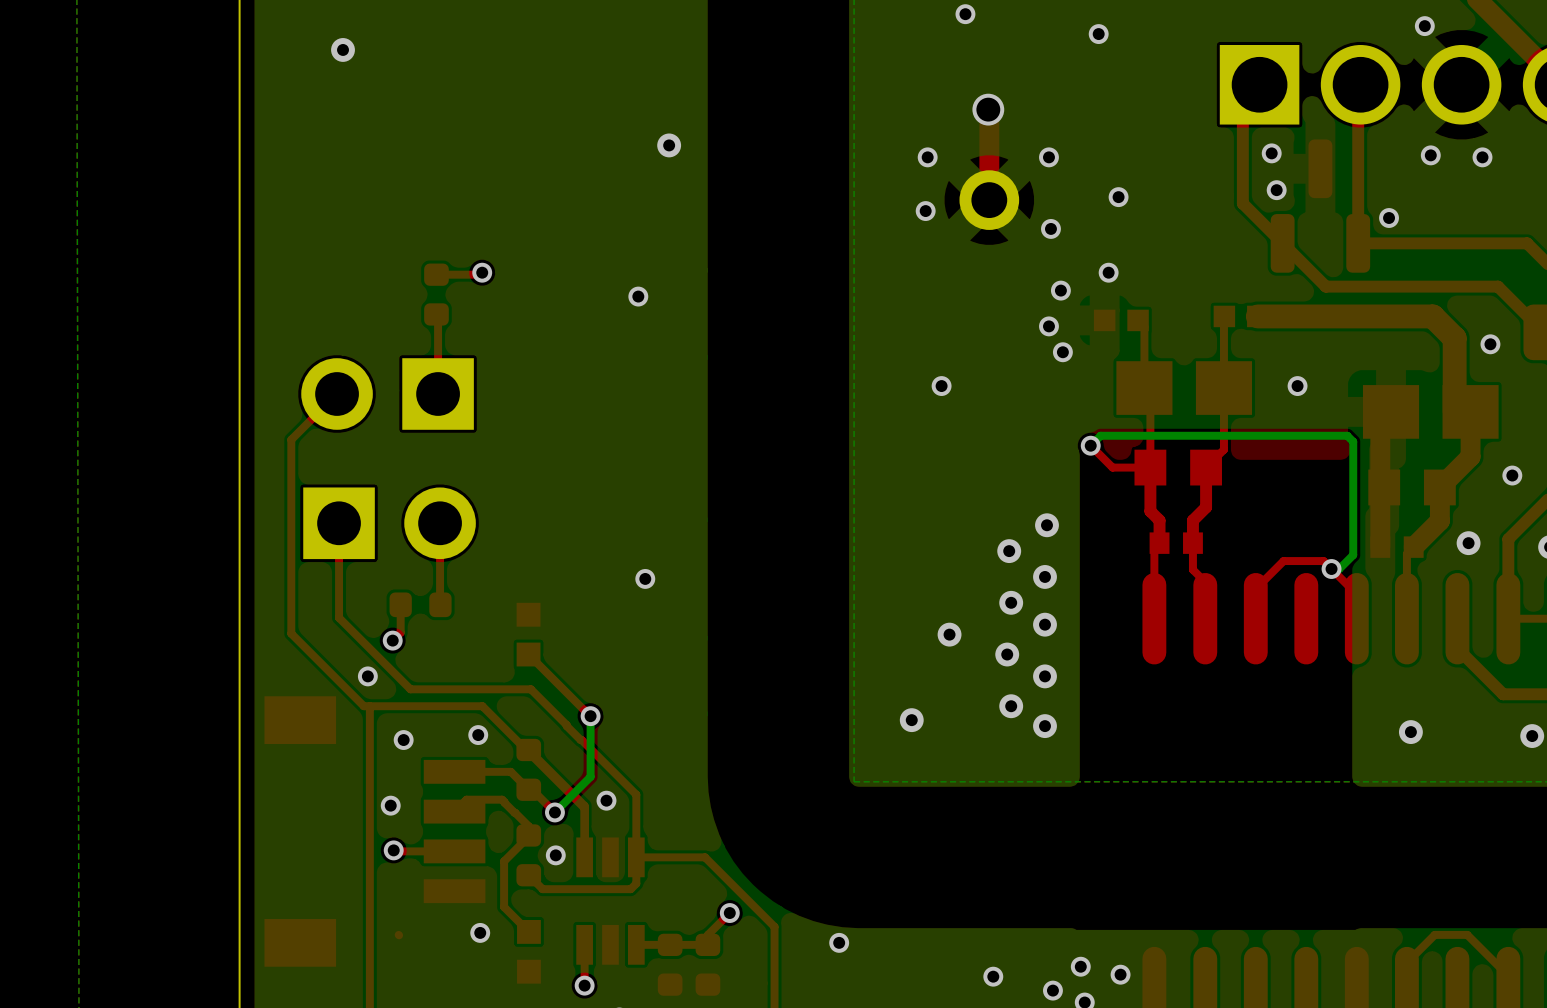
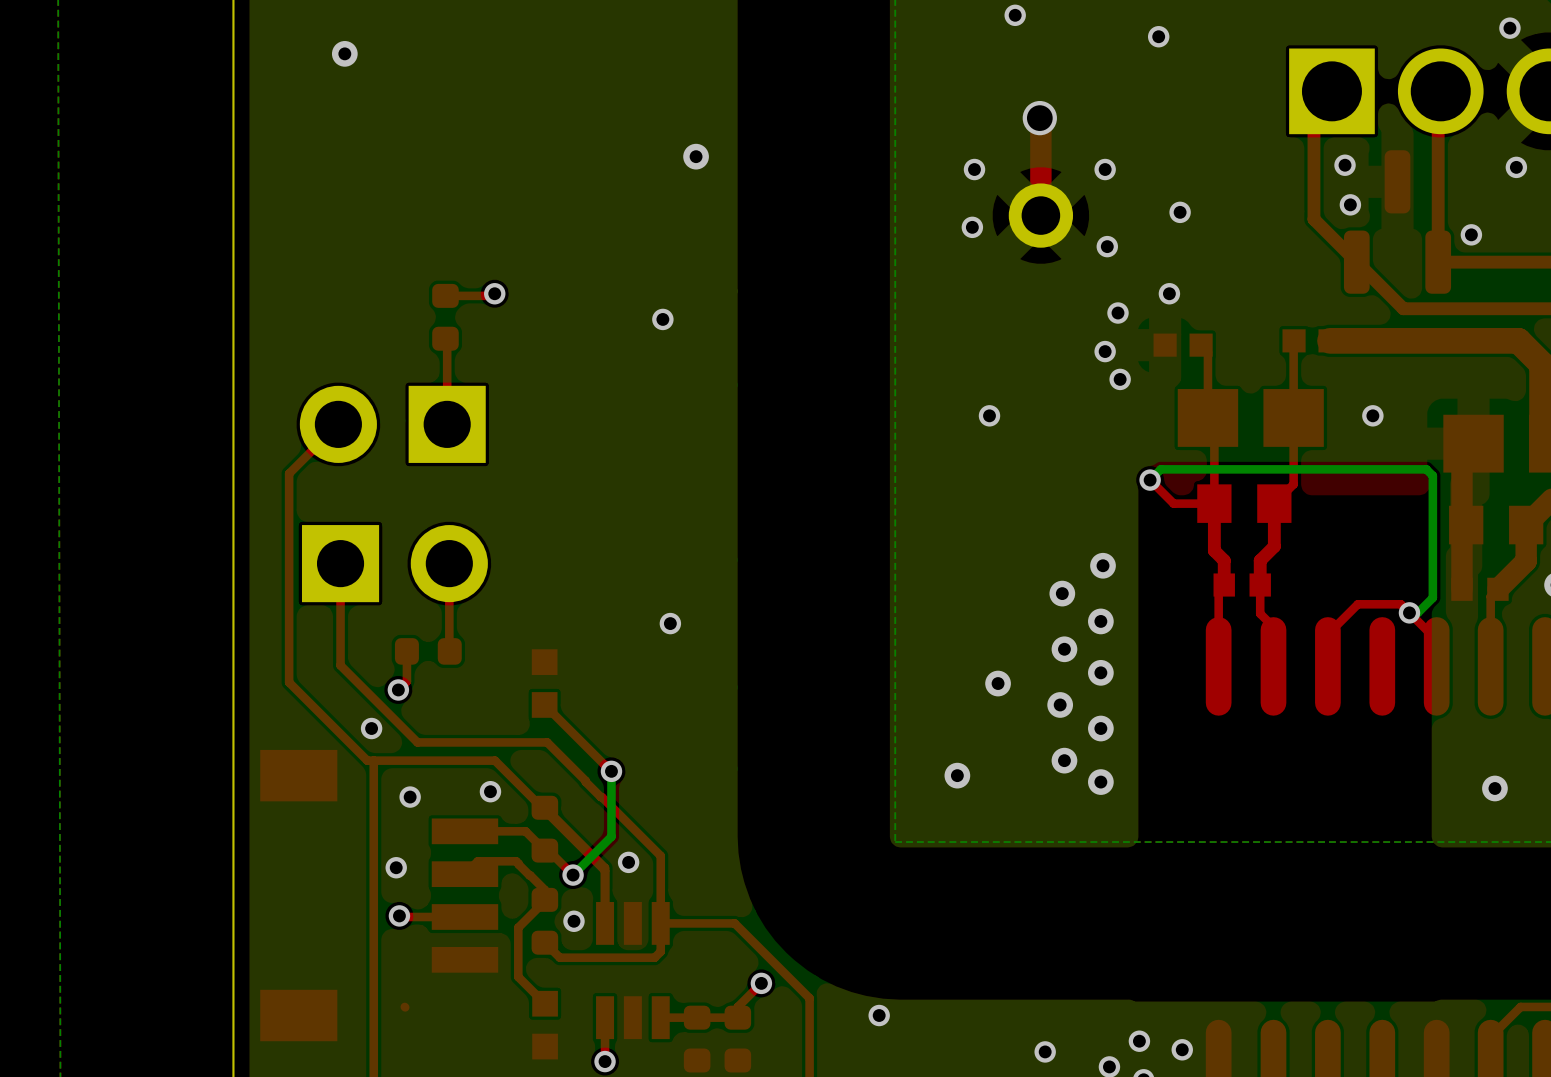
via: (480, 932) -> none

